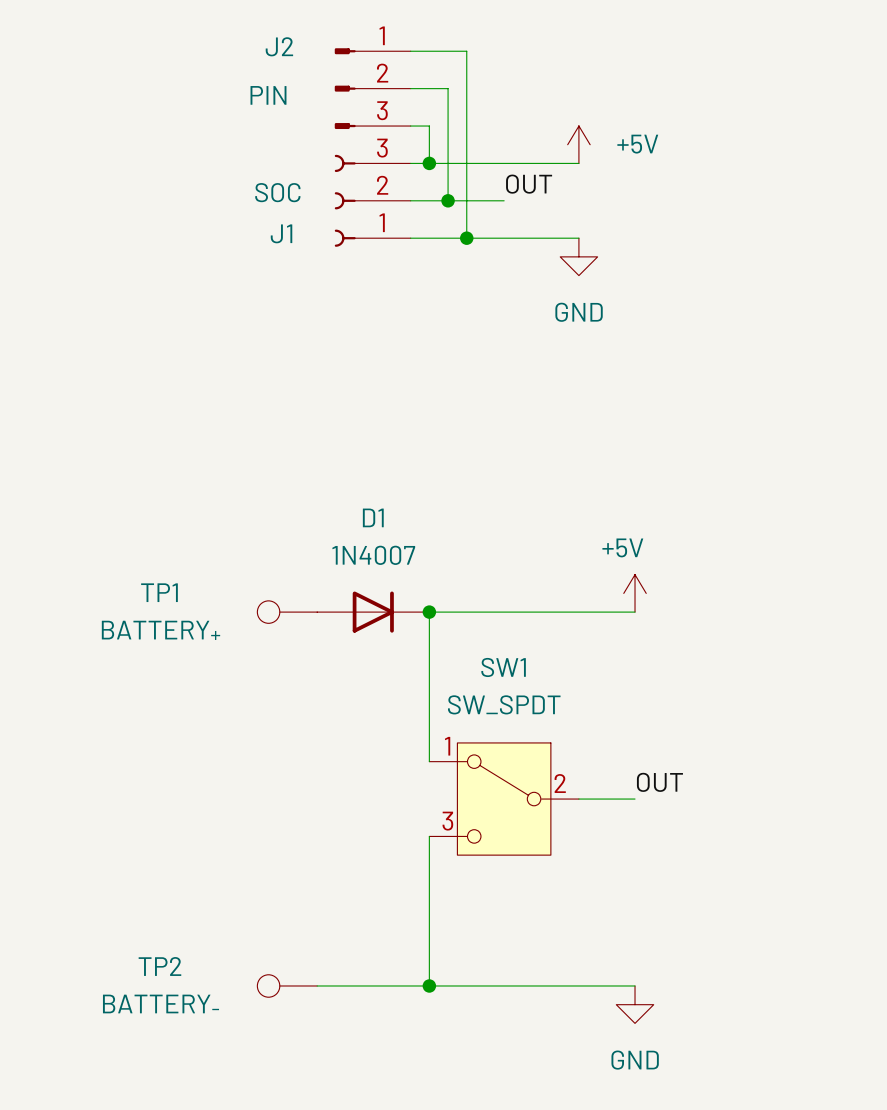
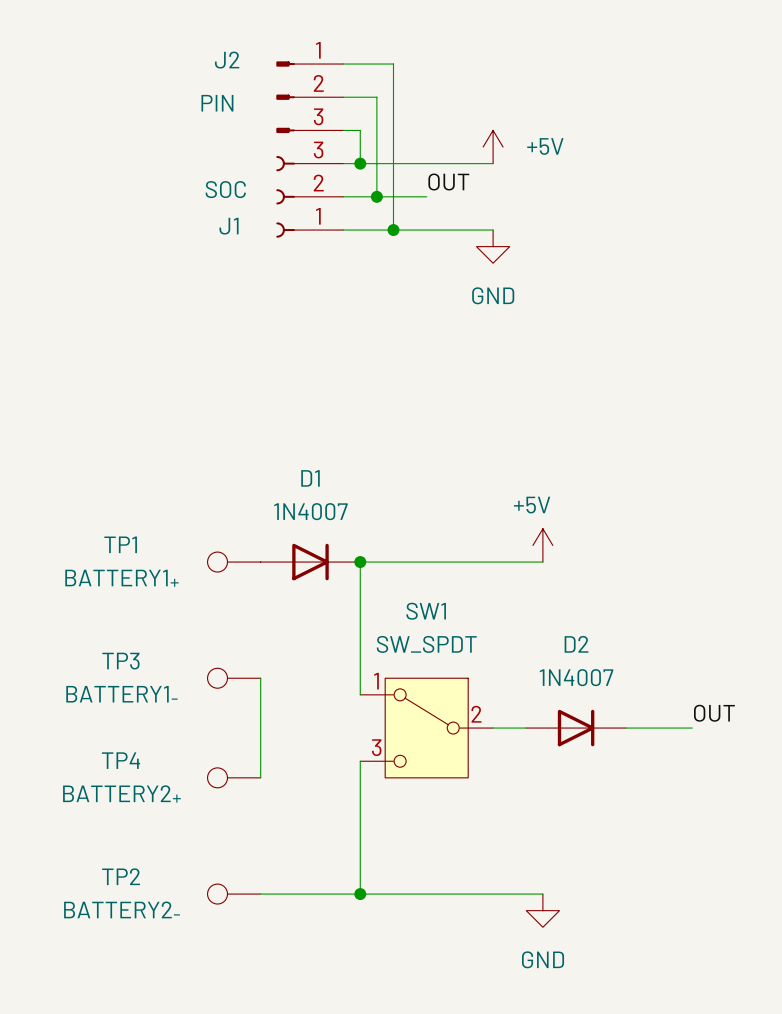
TP1 value: BATTERY+ (160, 630) -> BATTERY1+ (121, 578)
TP3: none -> BATTERY1- (234, 678)
wire: none -> (260, 678) (260, 777)
label position: OUT (659, 782) -> OUT (714, 713)
D2: none -> 1N4007 (576, 728)
wire: none -> (625, 728) (692, 728)
TP4: none -> BATTERY2+ (234, 777)
TP2 value: BATTERY- (160, 1003) -> BATTERY2- (121, 909)

